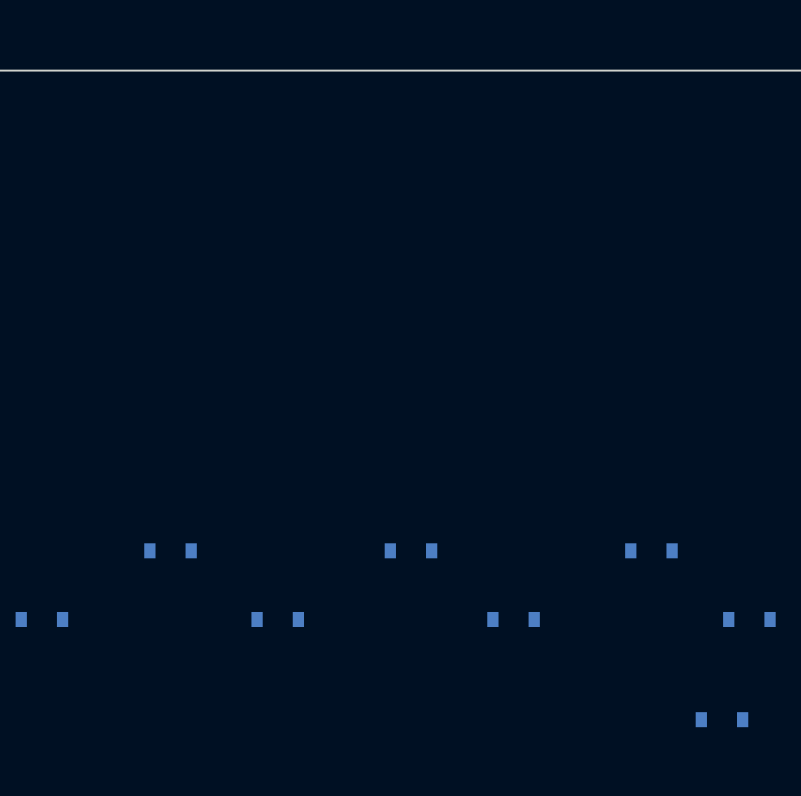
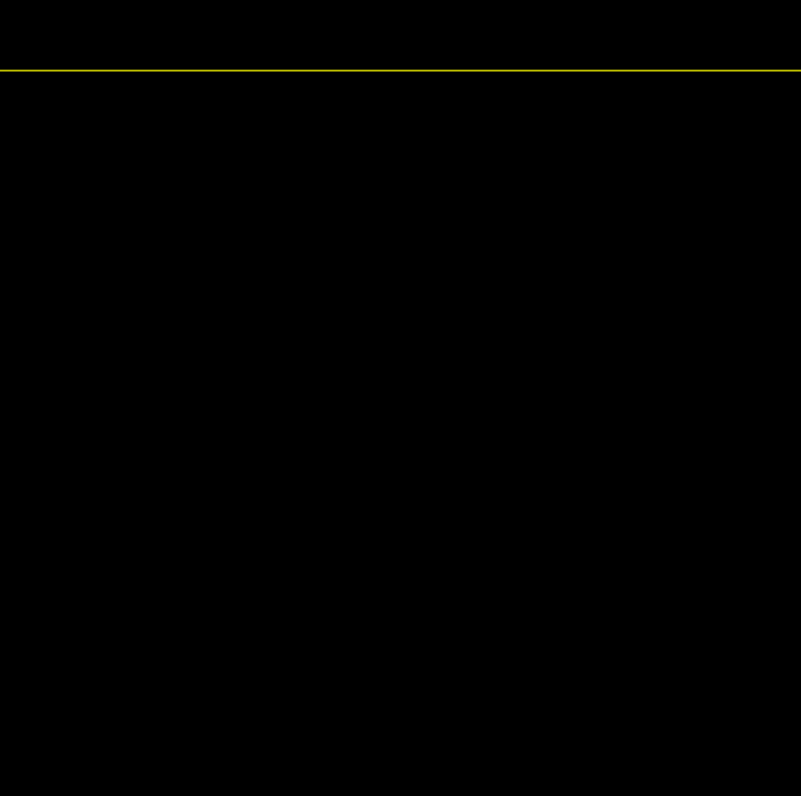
part: (170, 550) -> none
part: (410, 550) -> none
part: (651, 550) -> none
part: (41, 619) -> none
part: (277, 619) -> none
part: (513, 619) -> none
part: (749, 619) -> none
part: (721, 719) -> none

